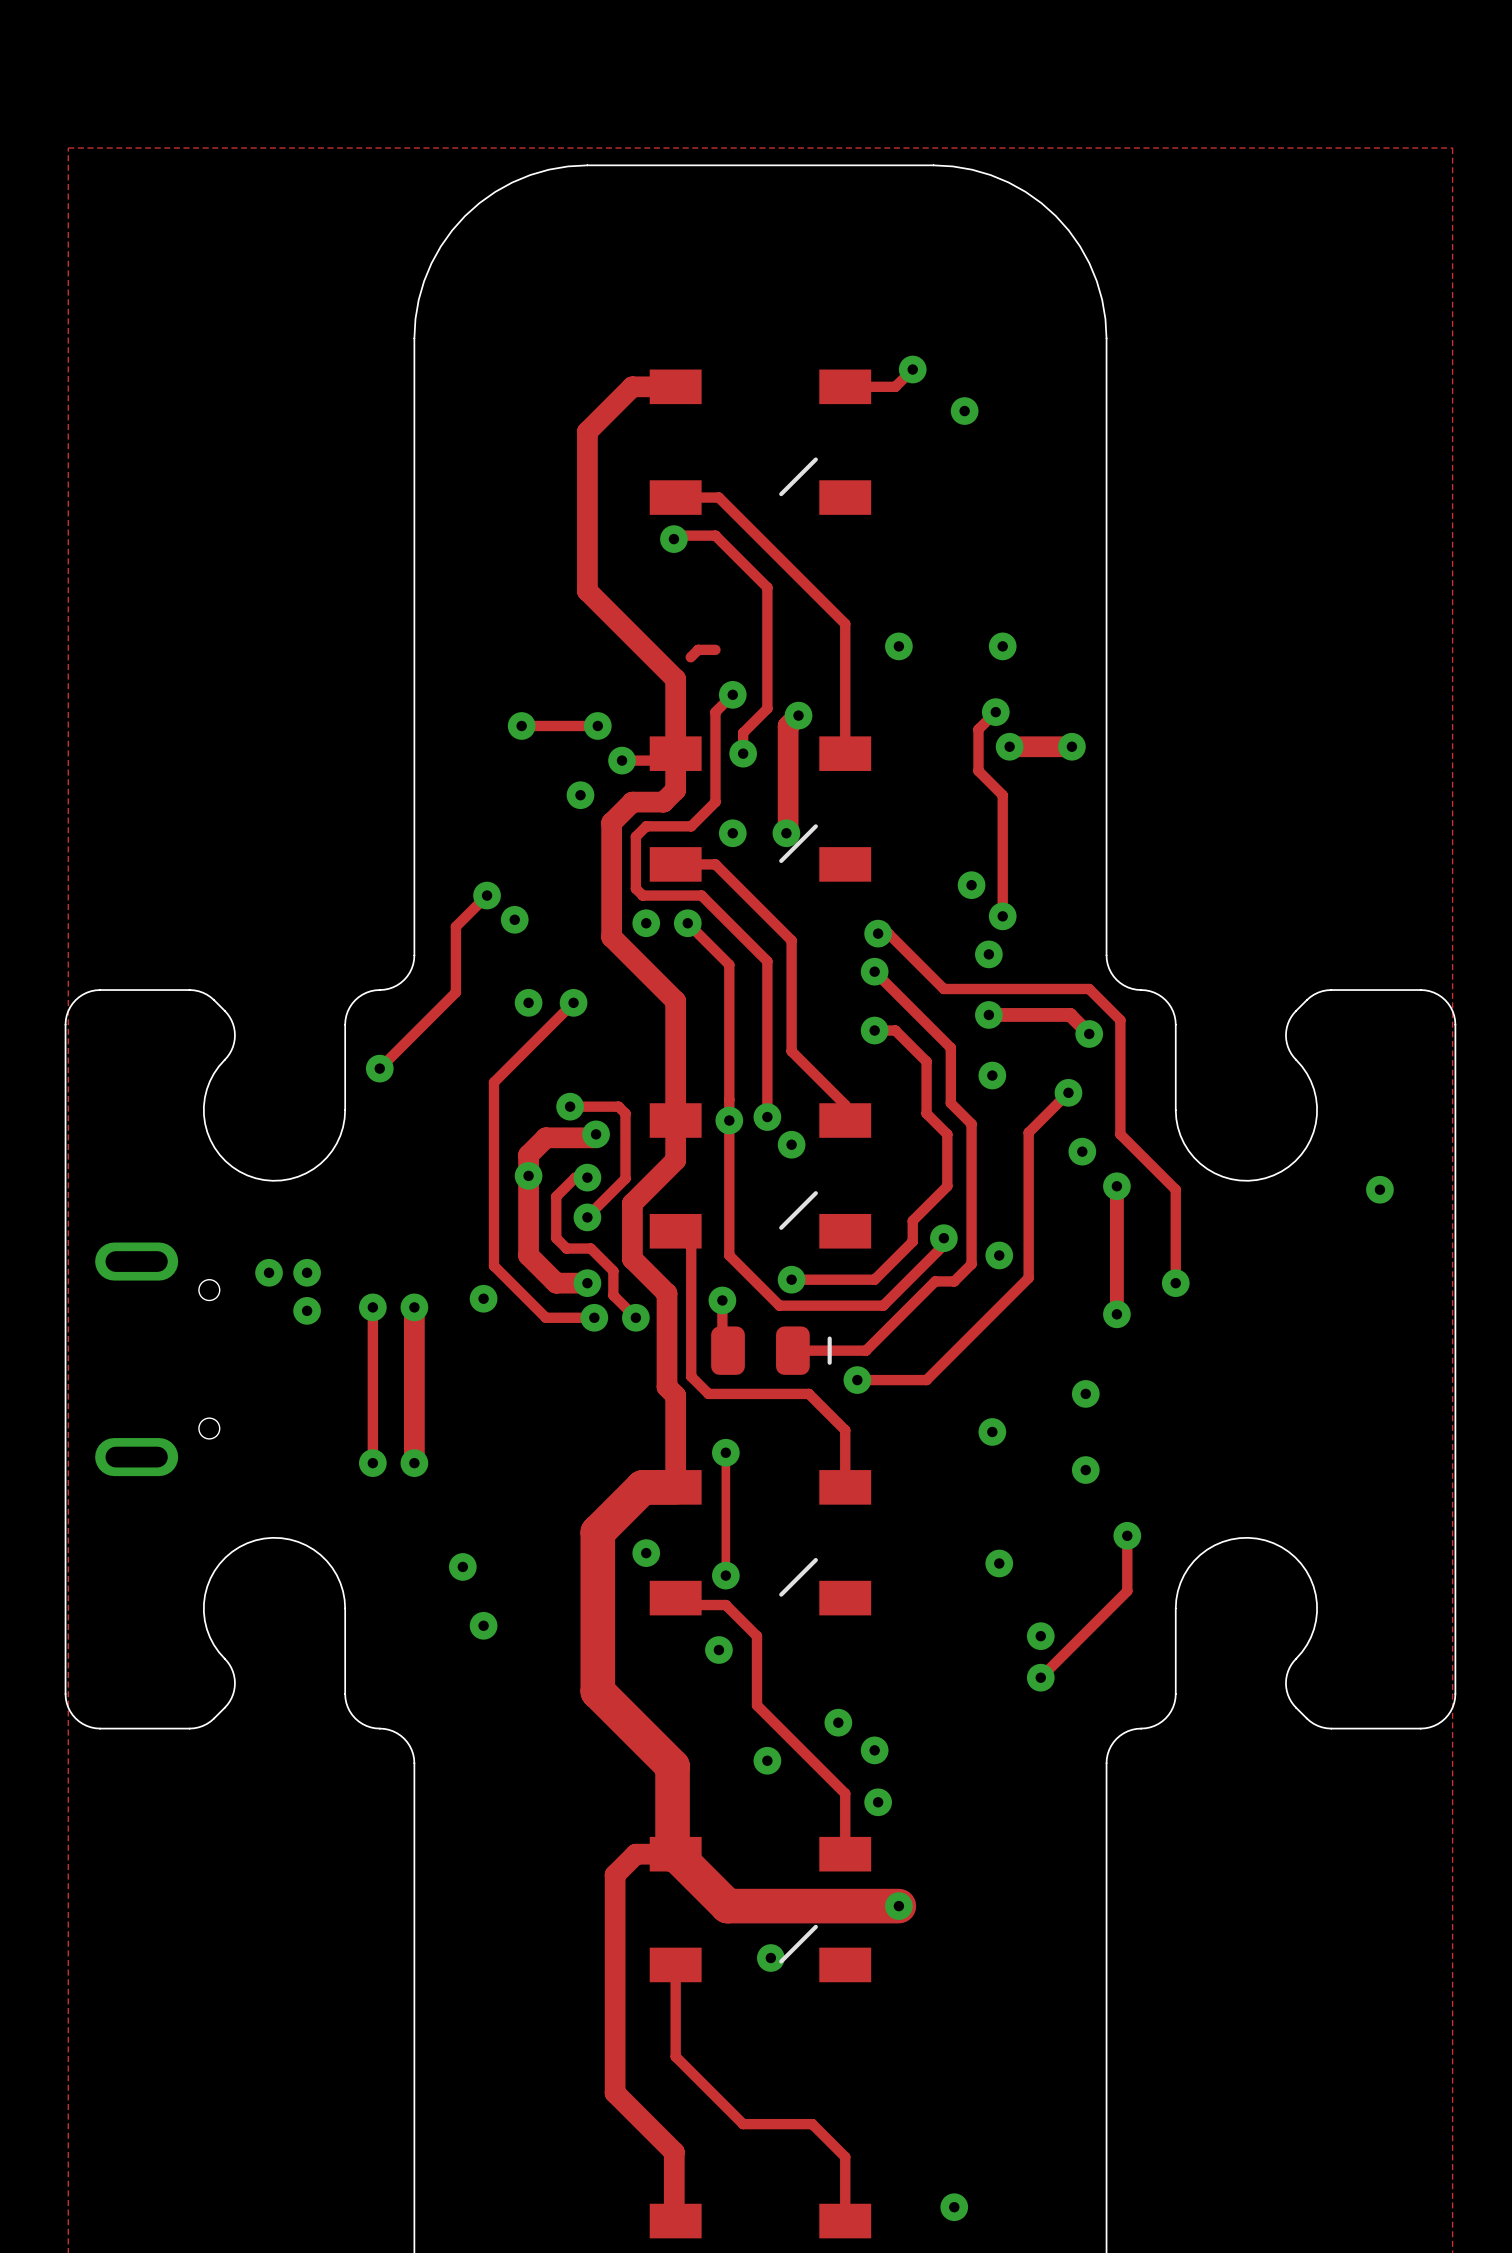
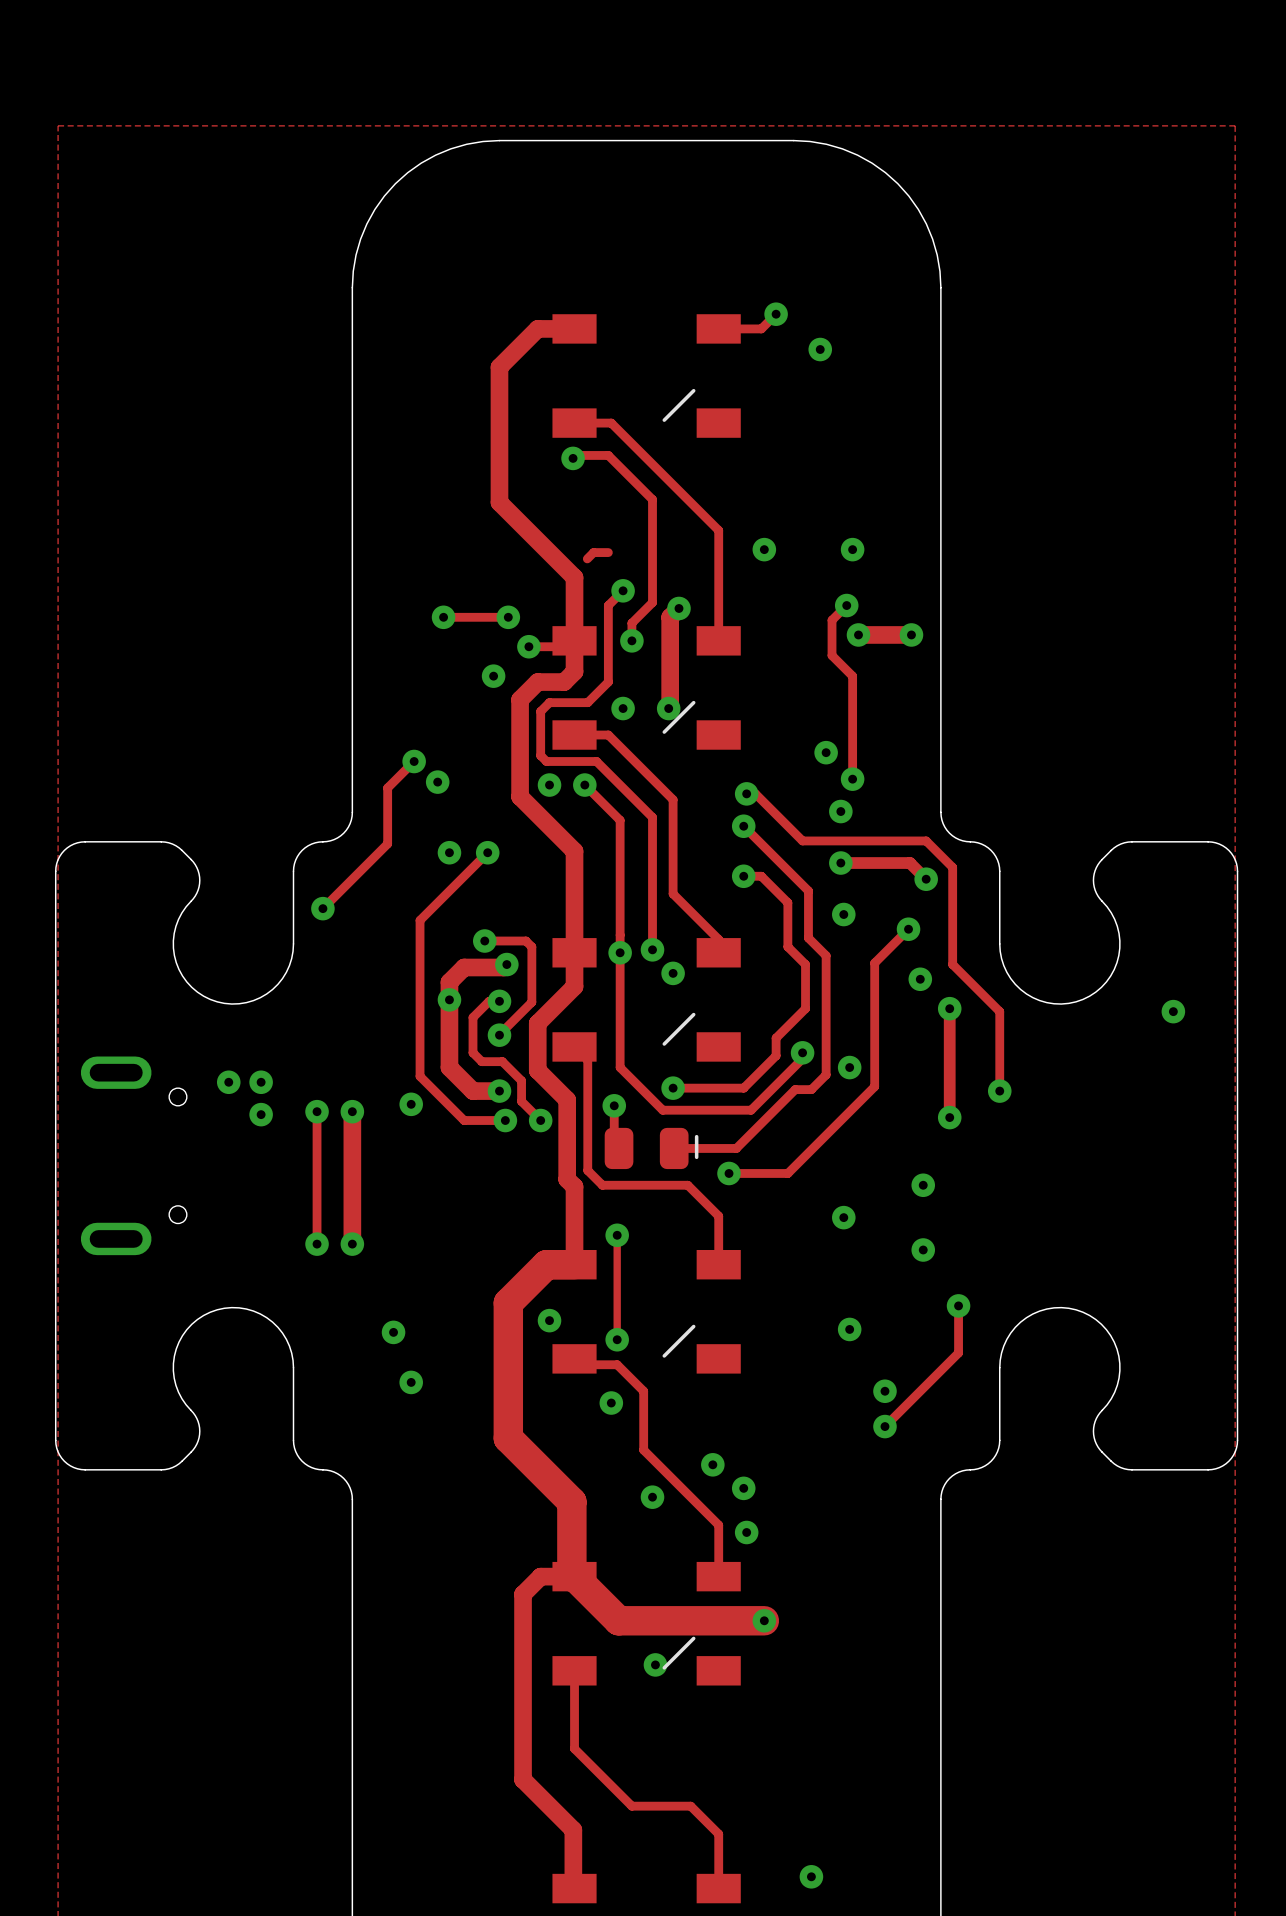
part footprint: [711, 1326, 832, 1375] -> [604, 1127, 699, 1170]

